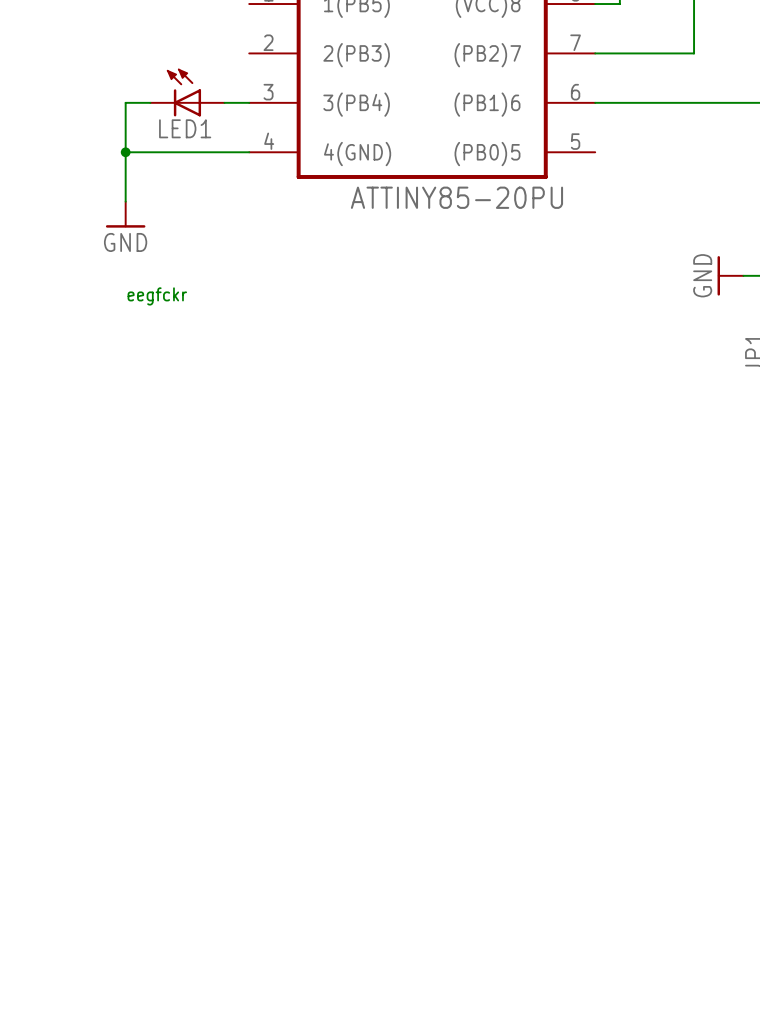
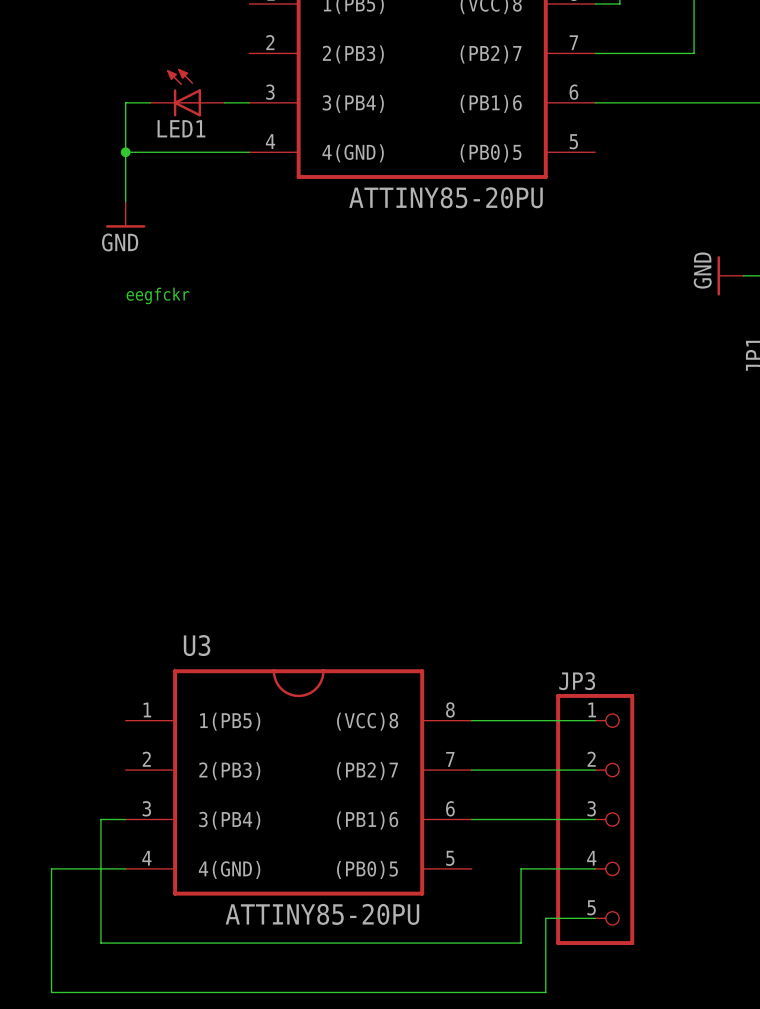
wire: none -> (471, 720) (595, 720)
wire: none -> (471, 770) (595, 770)
U3: none -> ATTINY85-20PU (298, 782)
wire: none -> (125, 819) (100, 819) (100, 943) (521, 943) (521, 868) (595, 868)
wire: none -> (471, 819) (595, 819)
JP3: none -> (595, 819)
wire: none -> (125, 868) (51, 868) (51, 992) (545, 992) (545, 918) (595, 918)

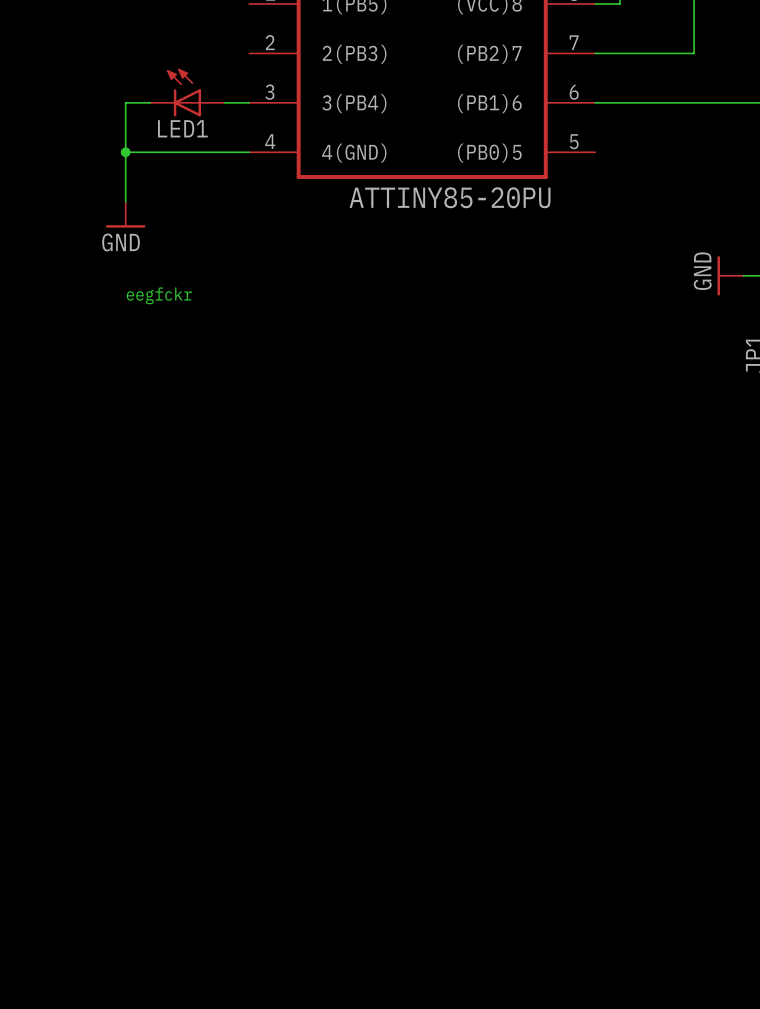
wire: (471, 720) (595, 720) -> none
wire: (471, 770) (595, 770) -> none
U3: ATTINY85-20PU (298, 782) -> none
wire: (125, 819) (100, 819) (100, 943) (521, 943) (521, 868) (595, 868) -> none
wire: (471, 819) (595, 819) -> none
JP3: (595, 819) -> none
wire: (125, 868) (51, 868) (51, 992) (545, 992) (545, 918) (595, 918) -> none

